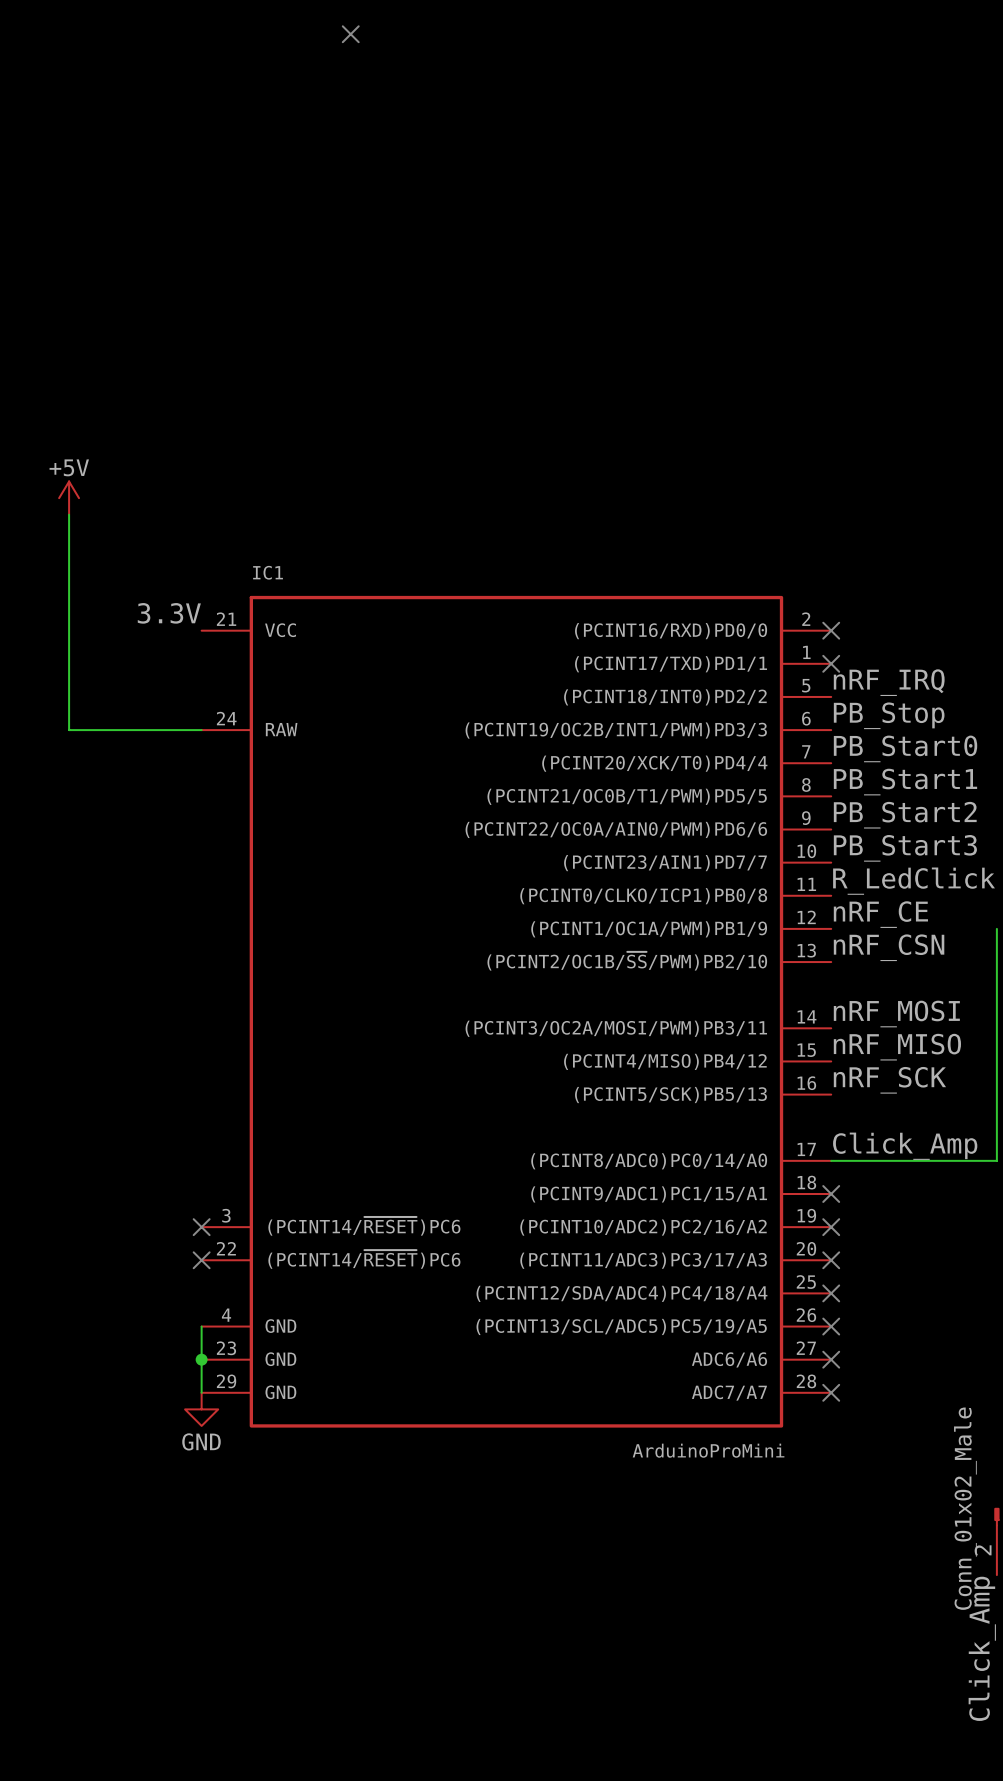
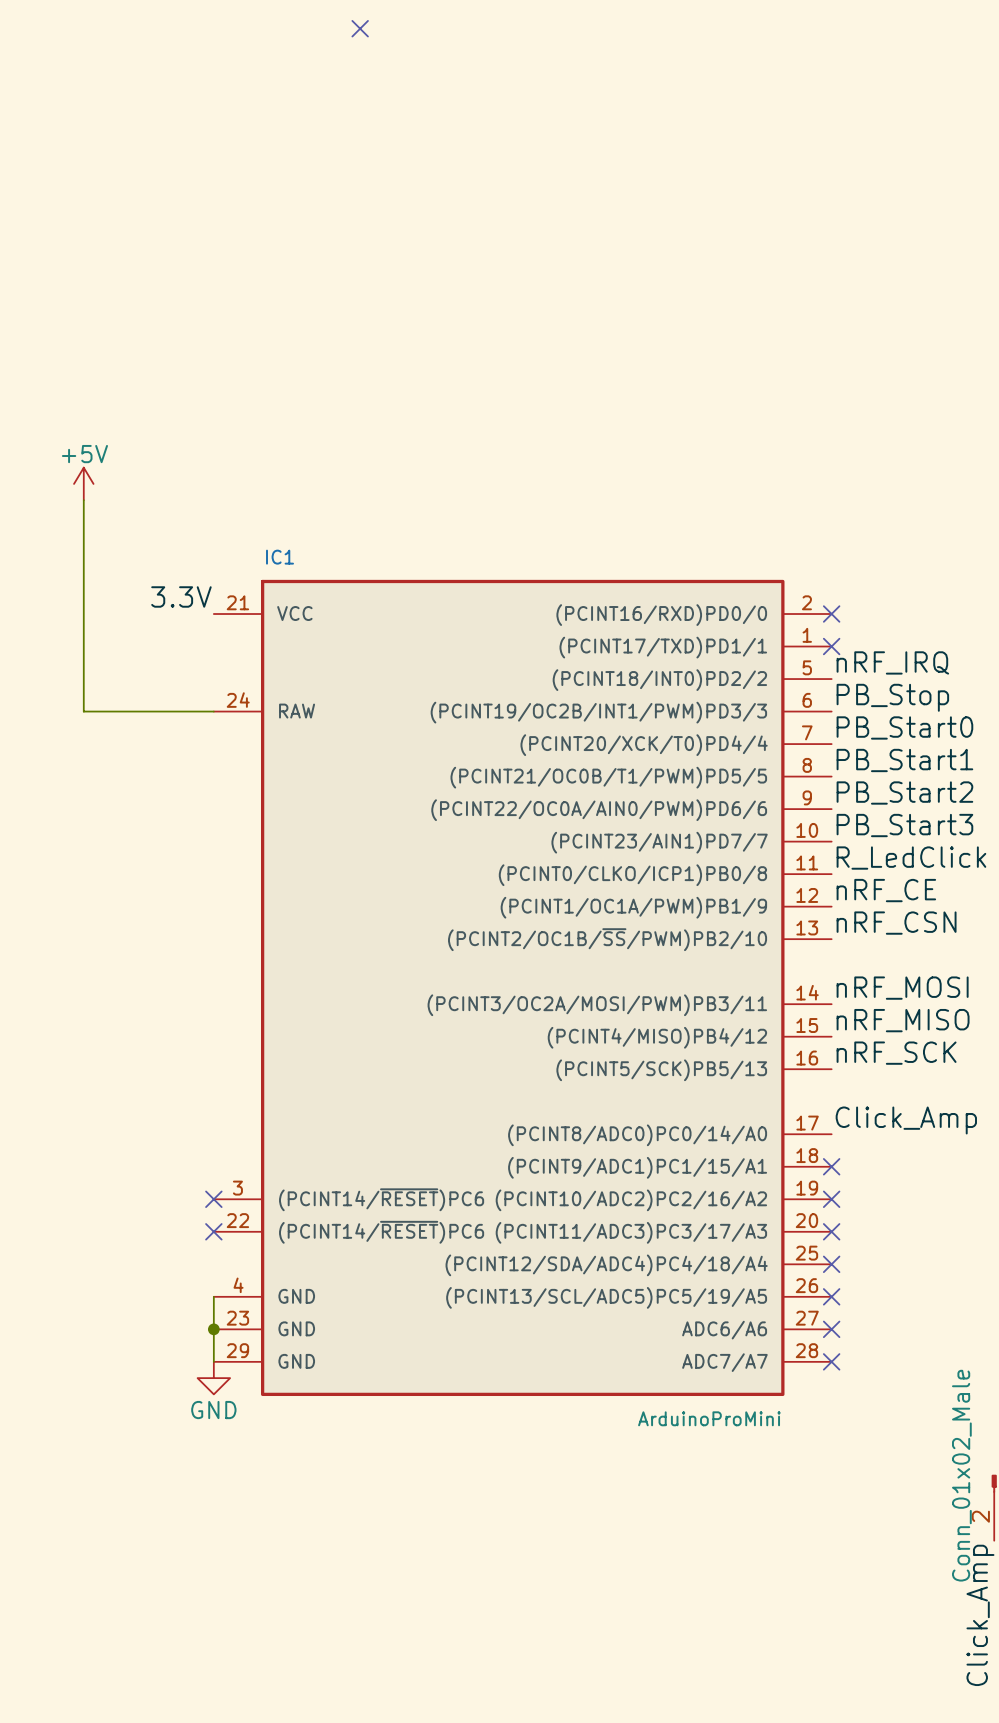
wire: (996, 928) (996, 1160) (831, 1160) -> none

